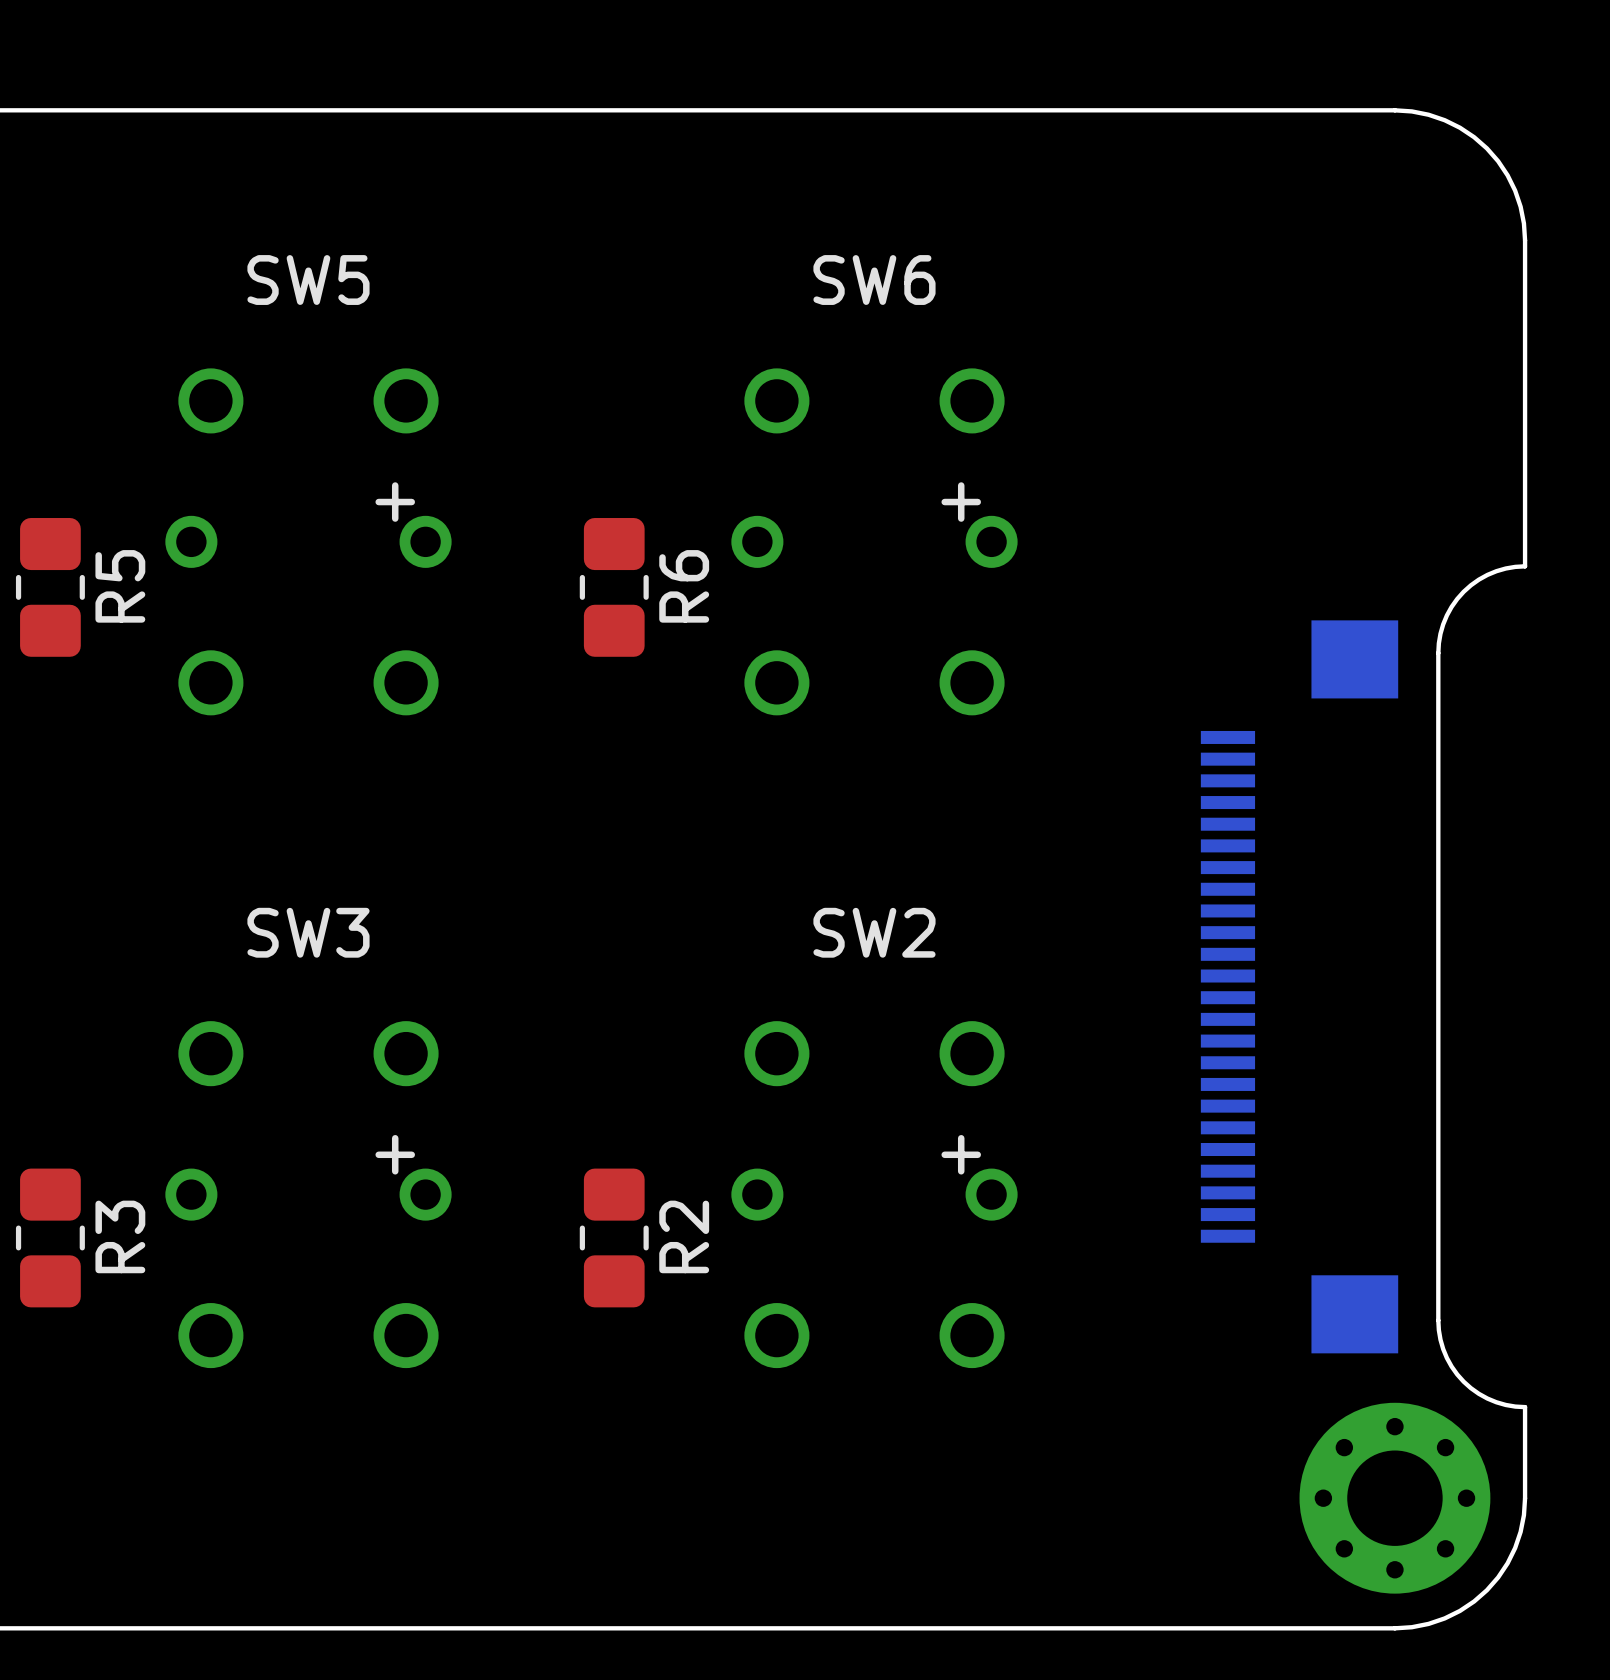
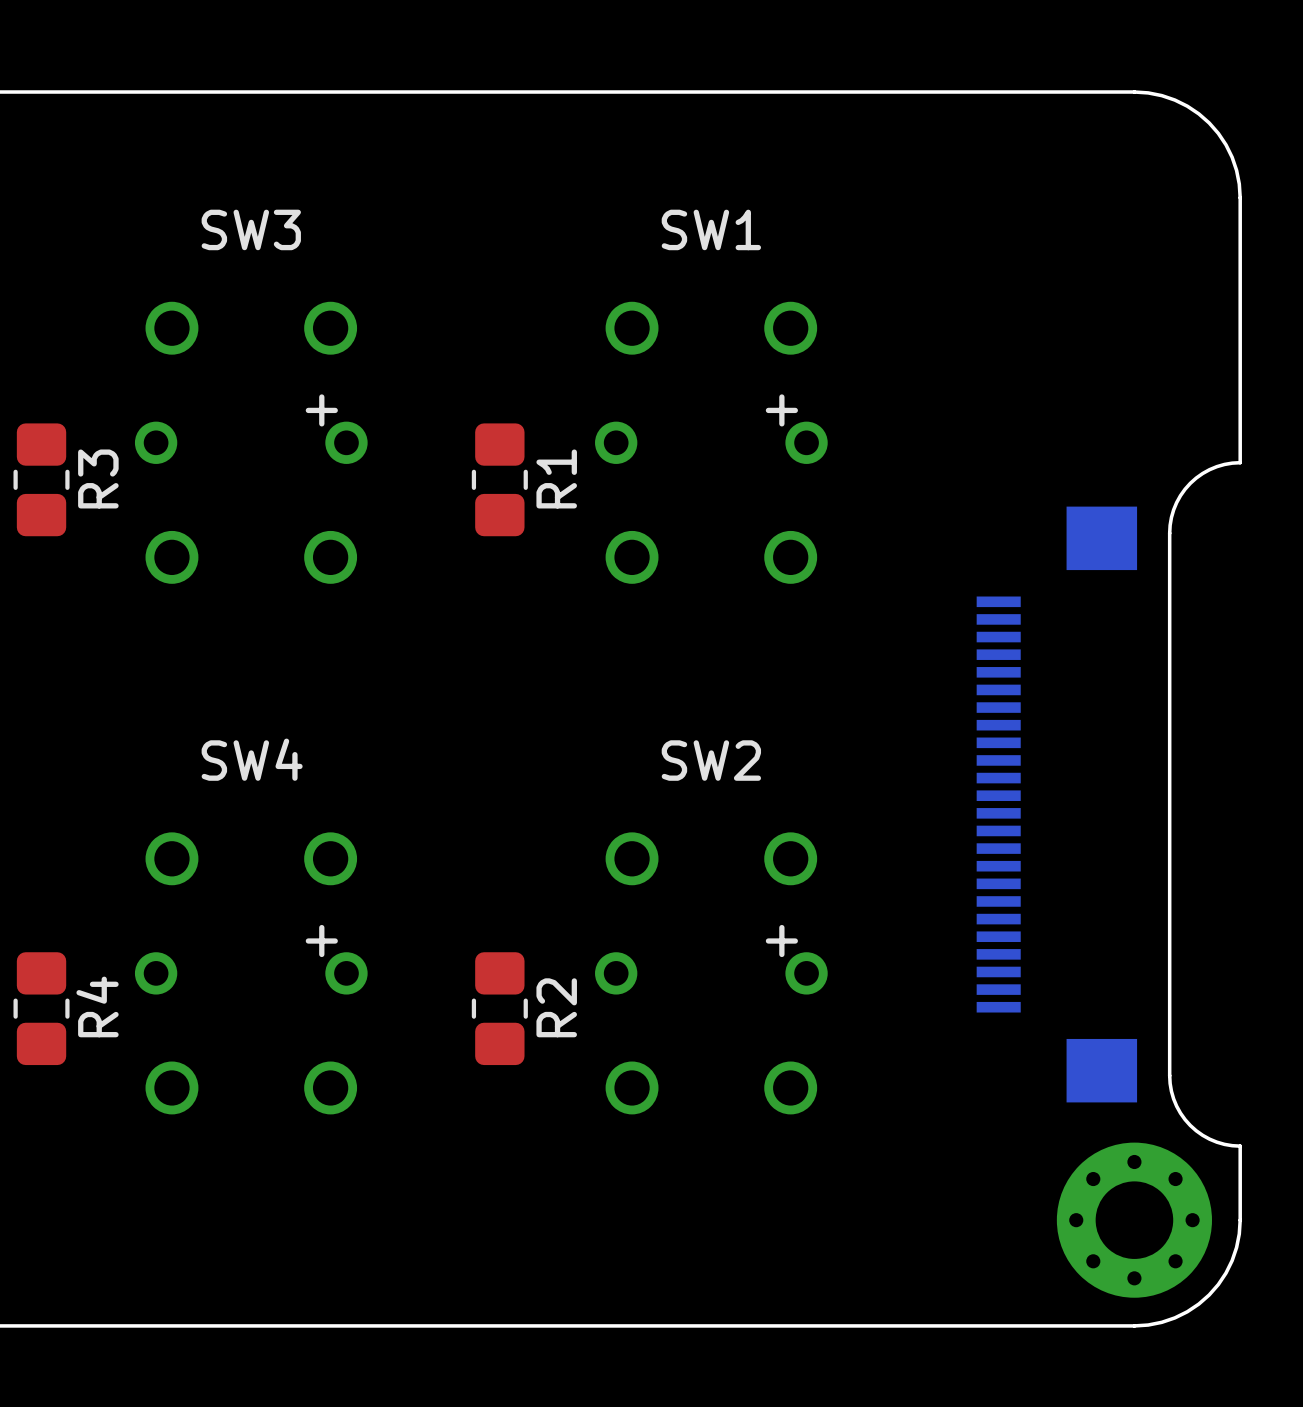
SW5 name: SW5 (308, 280) -> SW3 (251, 229)
SW6 name: SW6 (874, 280) -> SW1 (711, 229)
R5 name: R5 (120, 586) -> R3 (98, 478)
R6 name: R6 (684, 586) -> R1 (556, 478)
SW3 name: SW3 (308, 932) -> SW4 (252, 759)
R3 name: R3 (120, 1236) -> R4 (97, 1006)

